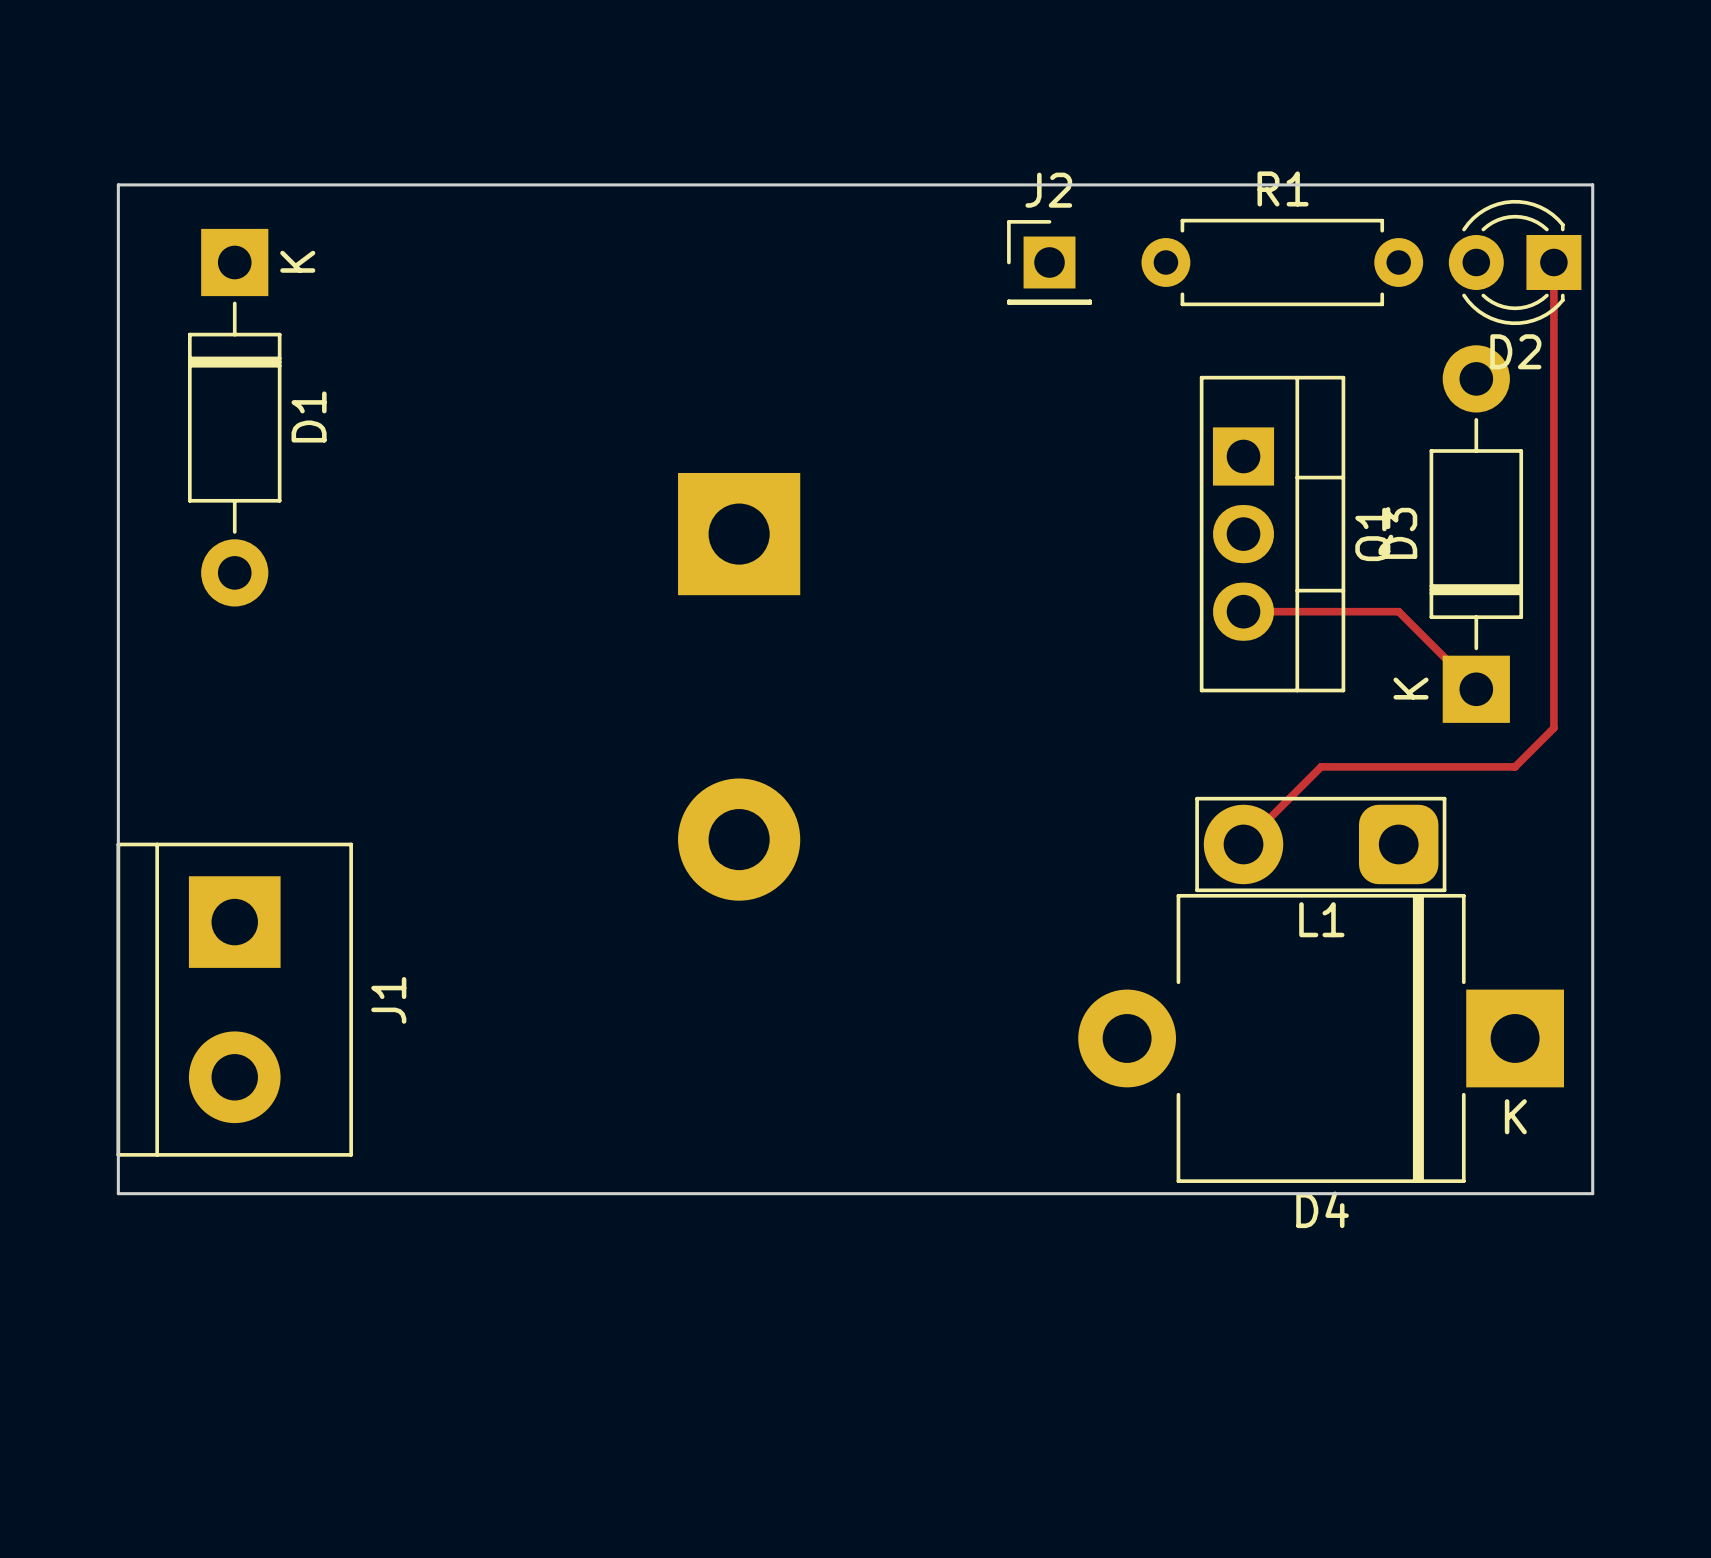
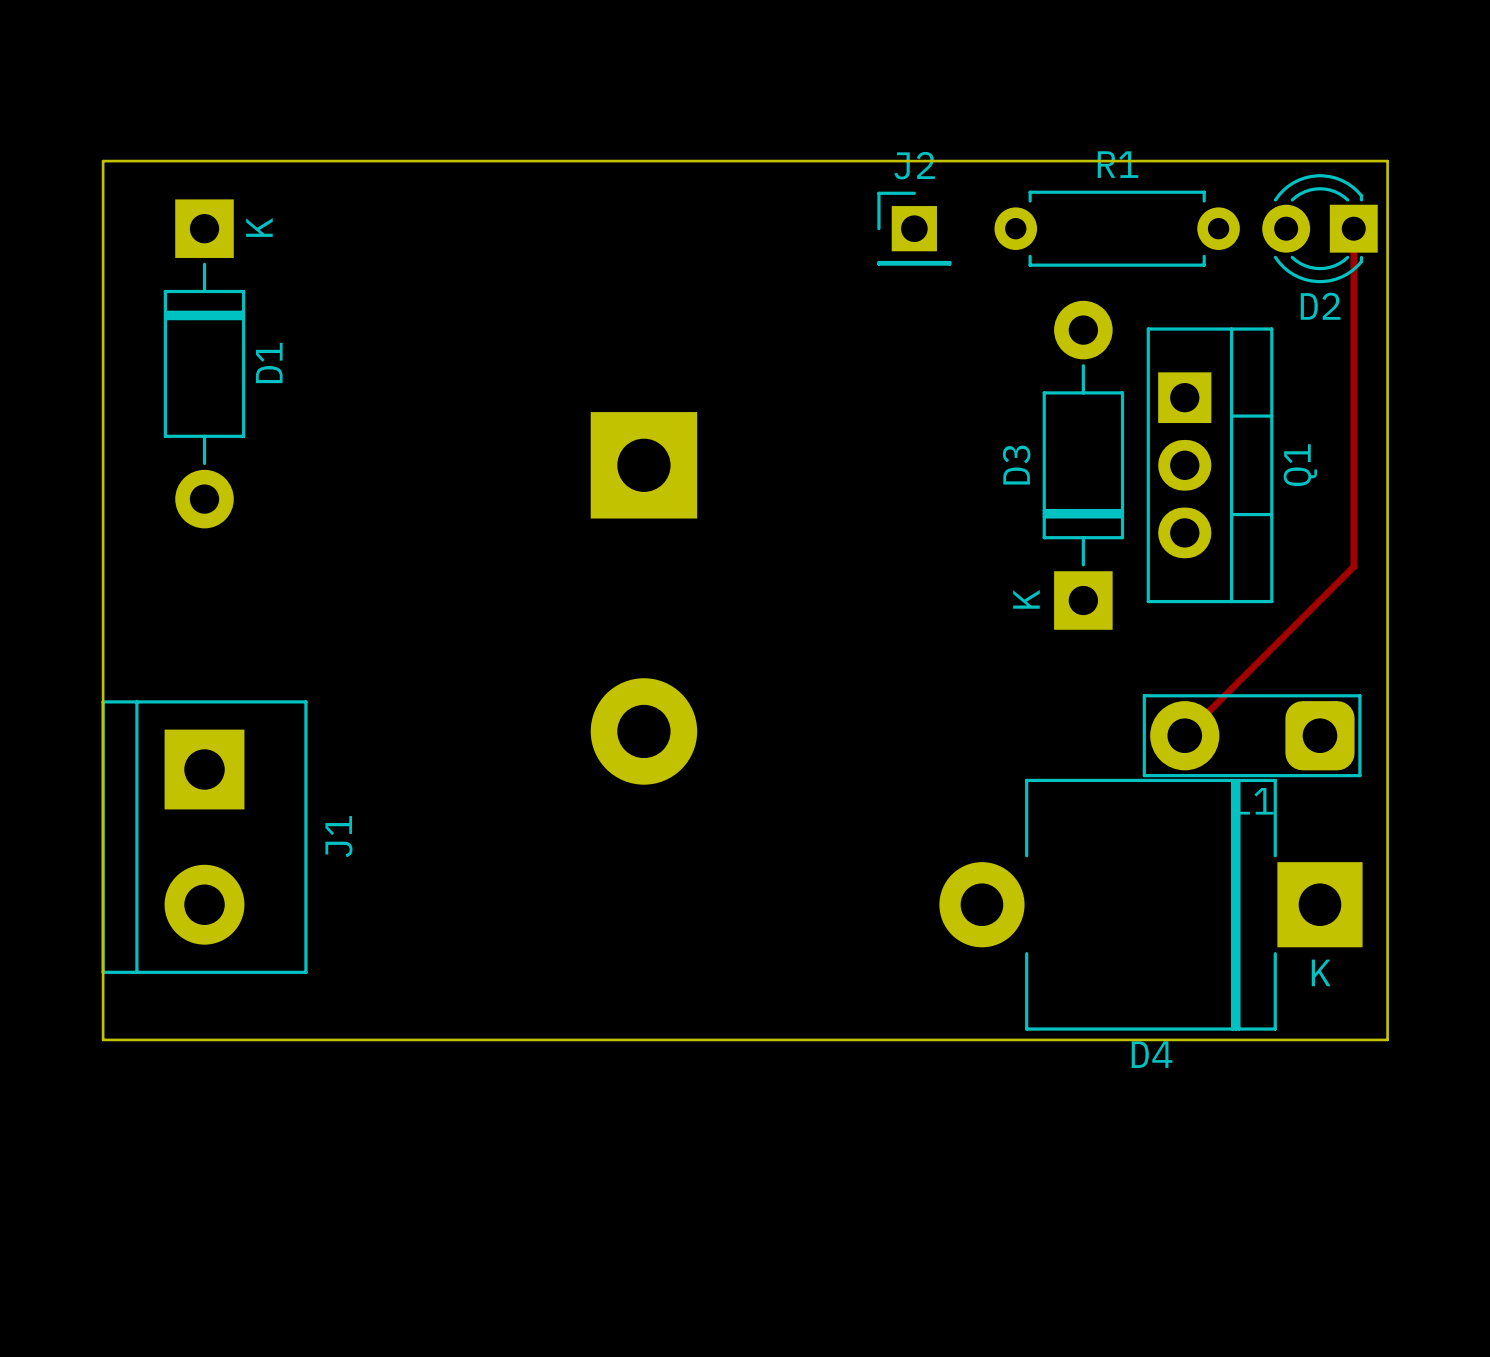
Q1 position: (1272, 534) -> (1210, 465)
D3 position: (1476, 534) -> (1083, 465)
track: (1243, 611) (1398, 611) (1476, 689) -> none
track: (1553, 650) (1553, 728) (1515, 766) (1321, 766) (1243, 844) -> (1353, 566) (1184, 735)
L1 position: (1320, 844) -> (1252, 735)
J1 position: (234, 999) -> (204, 837)

